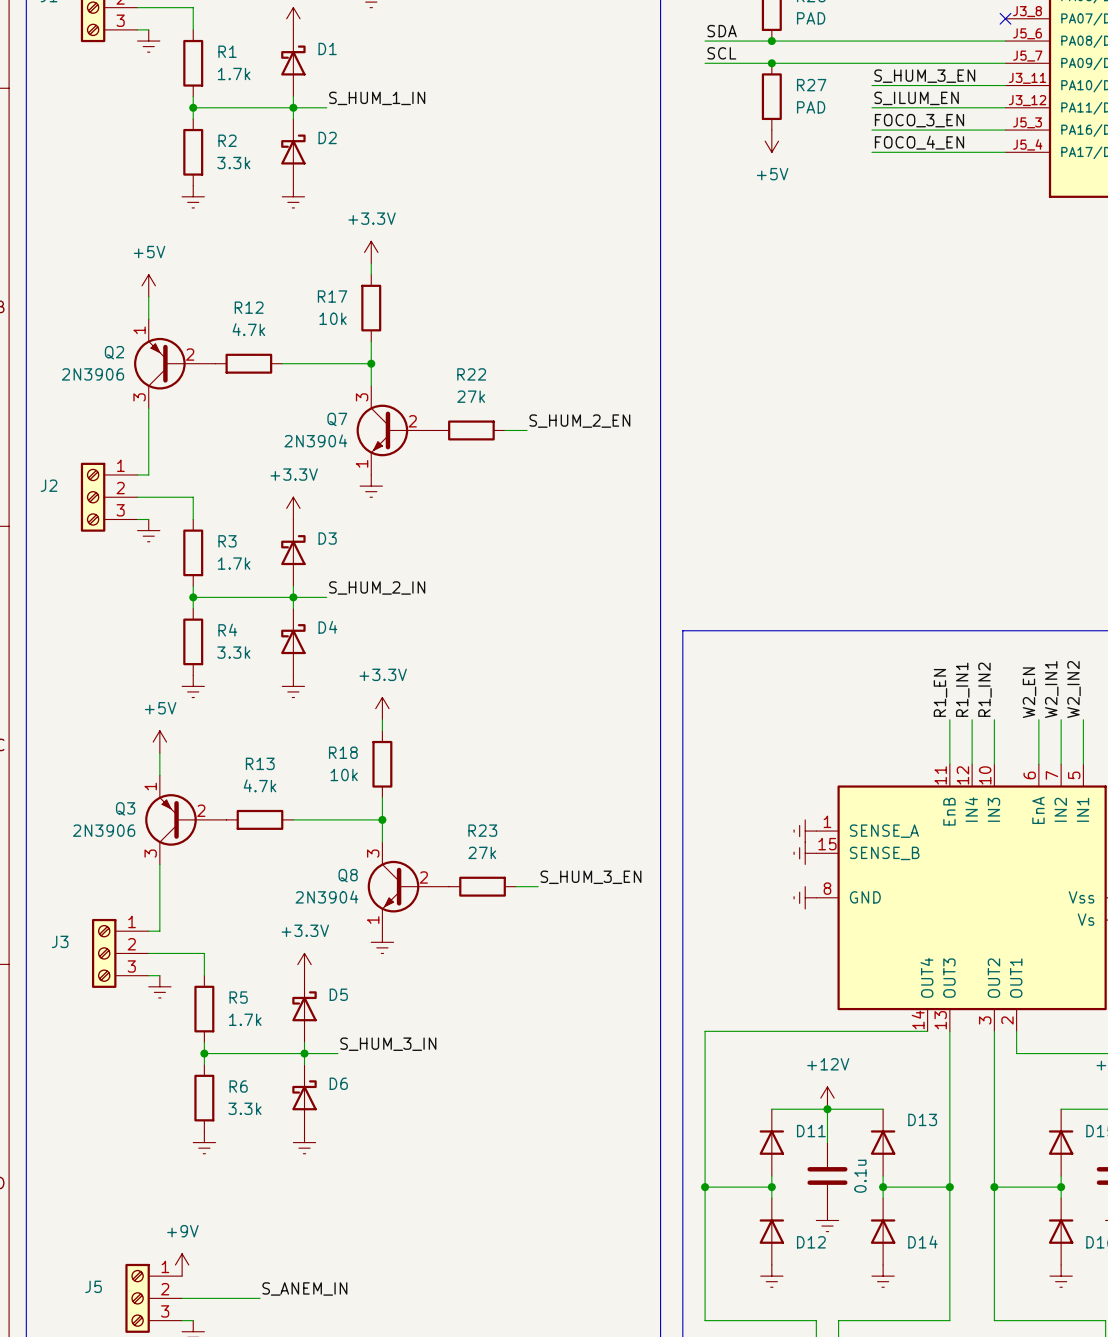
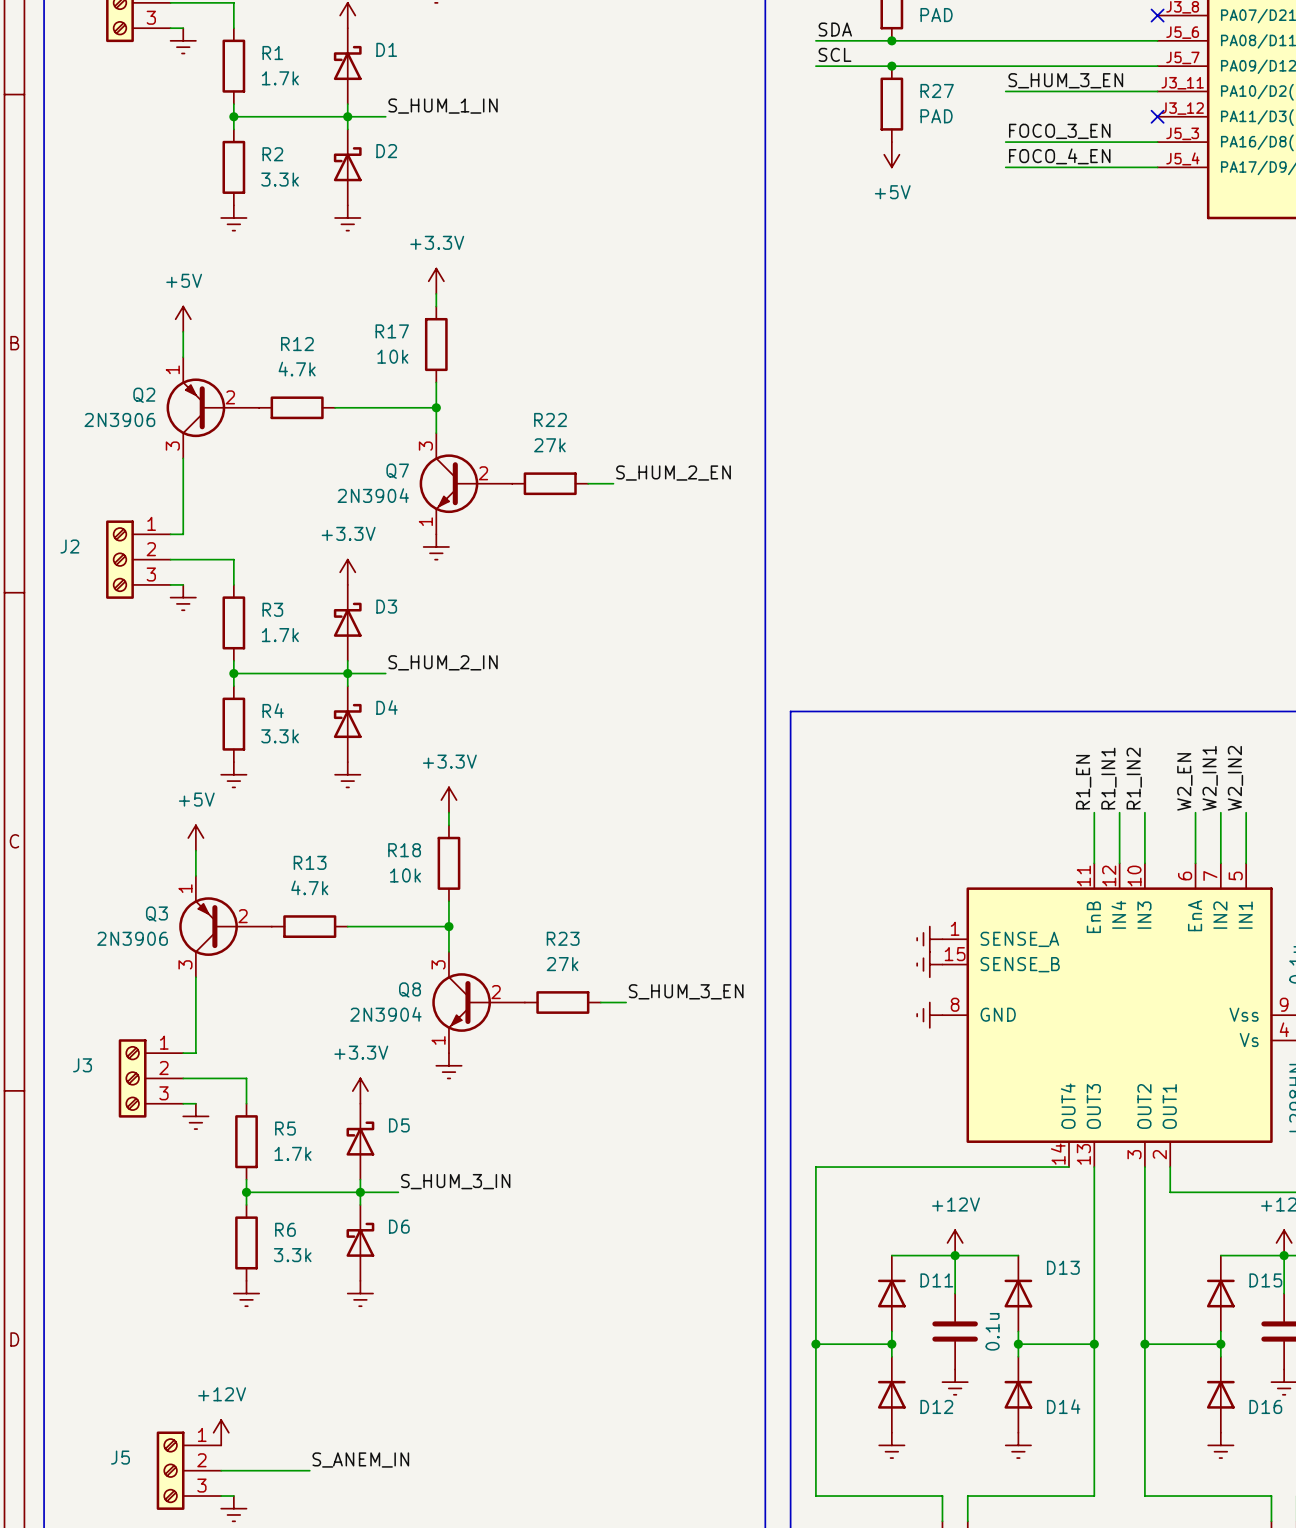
label: S_ILUM_EN (916, 98) -> none
wire: (871, 107) (1005, 107) -> none
no-connect mark: none -> (1157, 116)
power symbol: +9V (182, 1264) -> +12V (221, 1432)

